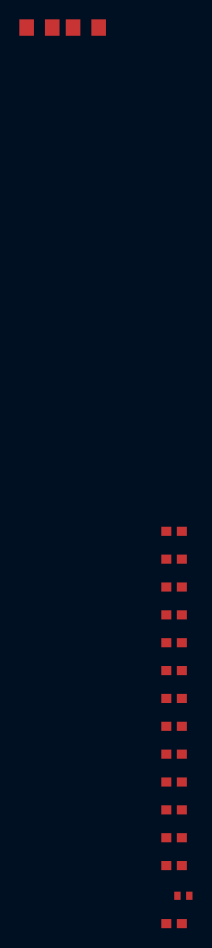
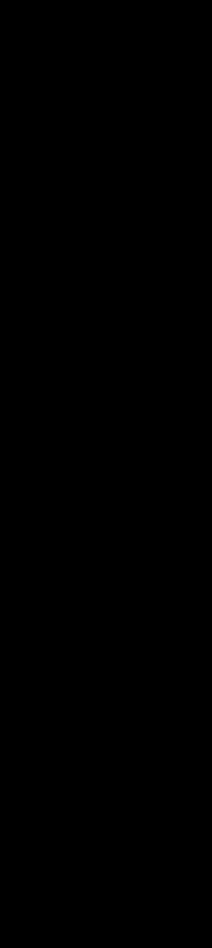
part: (39, 27) -> none
part: (85, 27) -> none
part: (174, 531) -> none
part: (174, 559) -> none
part: (174, 587) -> none
part: (174, 614) -> none
part: (174, 642) -> none
part: (174, 670) -> none
part: (174, 698) -> none
part: (174, 726) -> none
part: (174, 754) -> none
part: (174, 782) -> none
part: (174, 809) -> none
part: (174, 837) -> none
part: (174, 865) -> none
part: (183, 895) -> none
part: (174, 923) -> none

